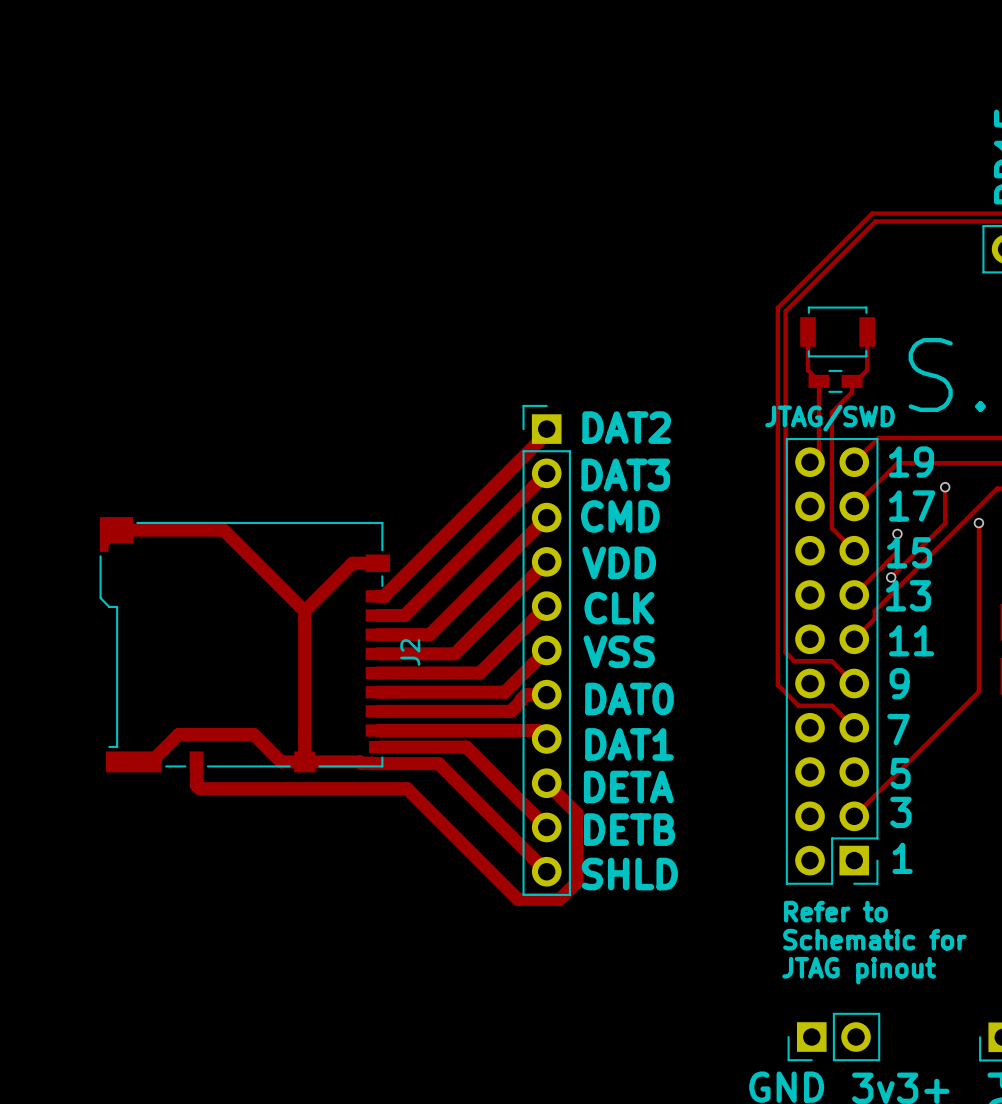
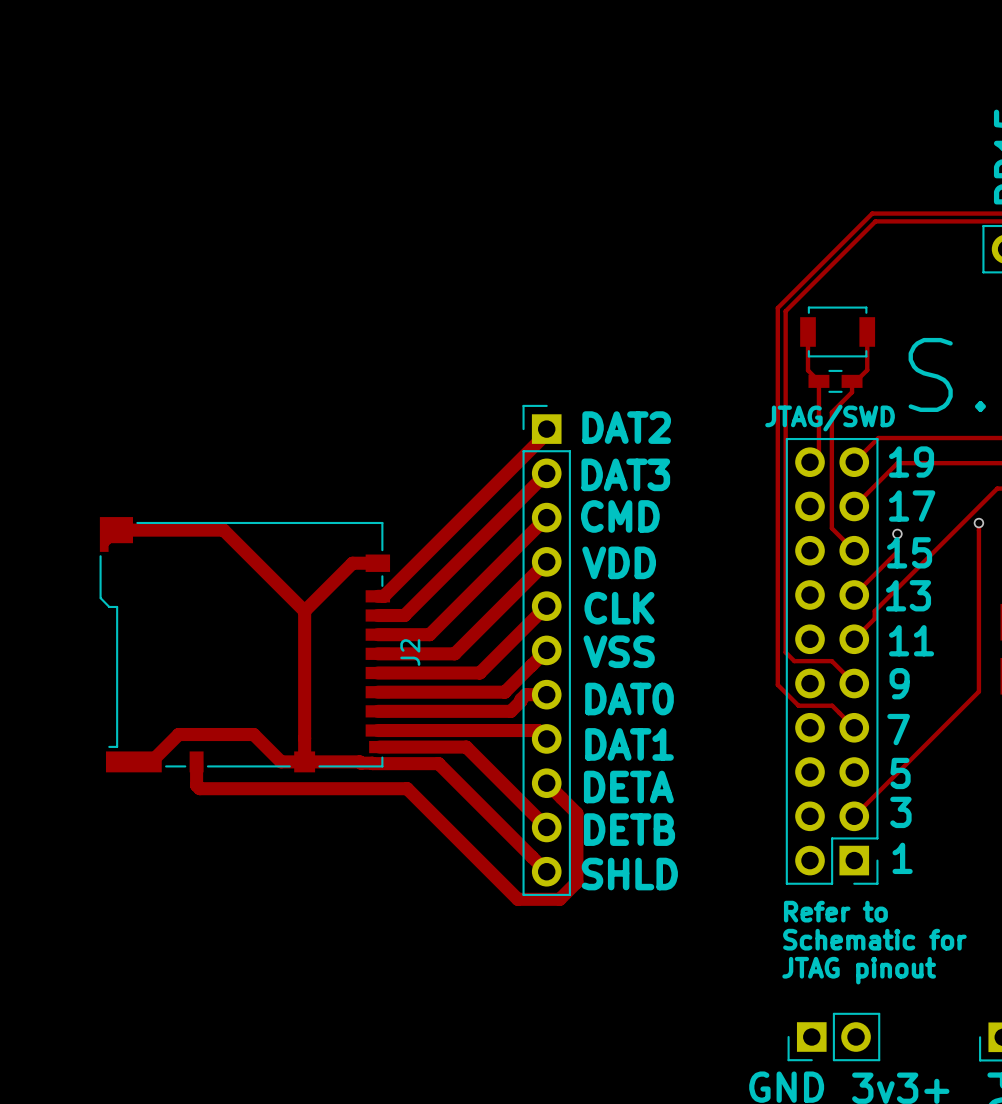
track: (945, 487) (945, 523) (891, 577) -> none
via: (945, 487) -> none
via: (891, 577) -> none

